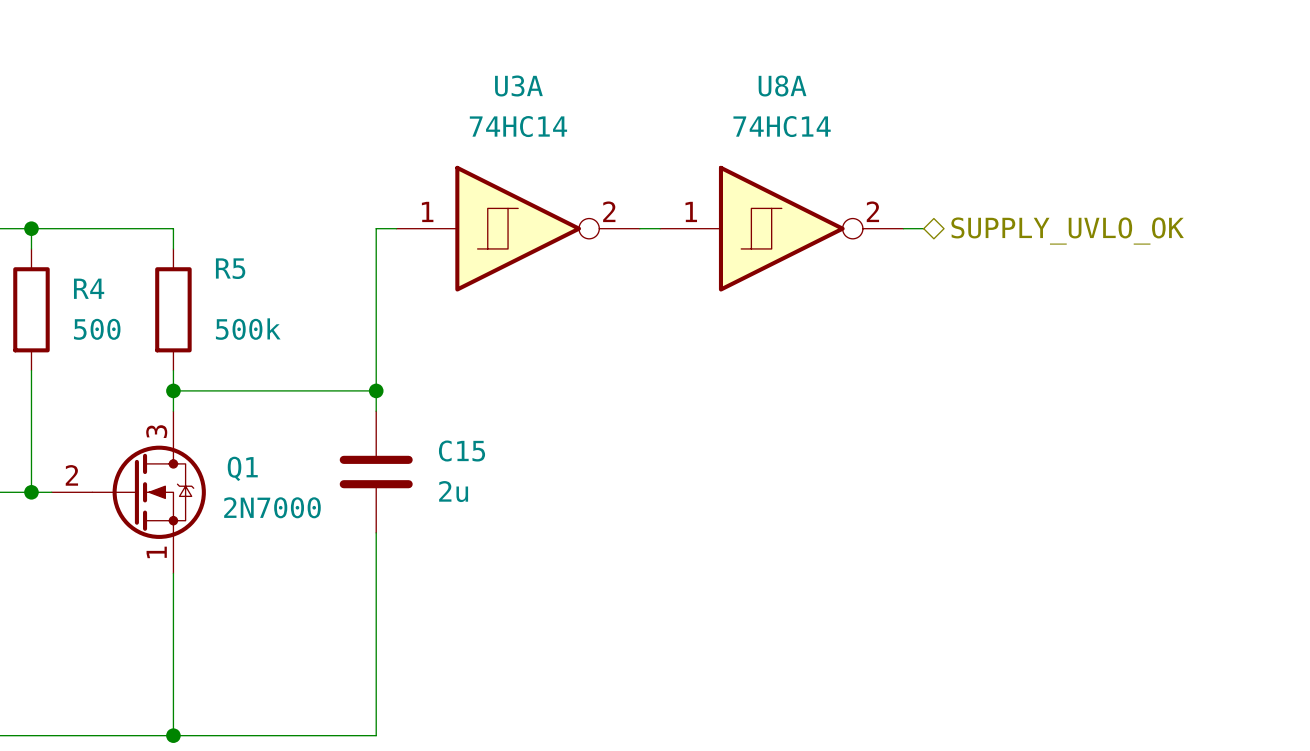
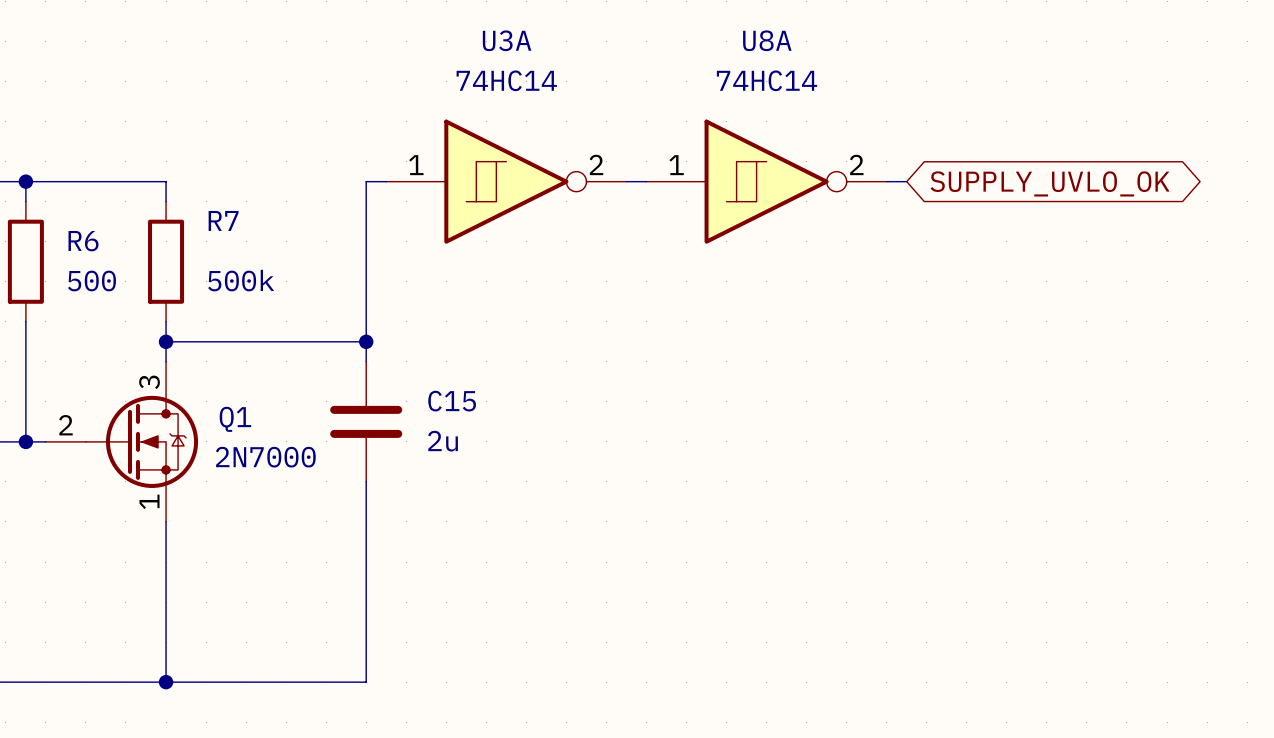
global label: none -> SUPPLY_UVLO_OK (1050, 183)
hierarchical label: SUPPLY_UVLO_OK (1067, 231) -> none
R5 name: R5 (230, 268) -> R7 (223, 220)
R4 name: R4 (89, 288) -> R6 (83, 241)

